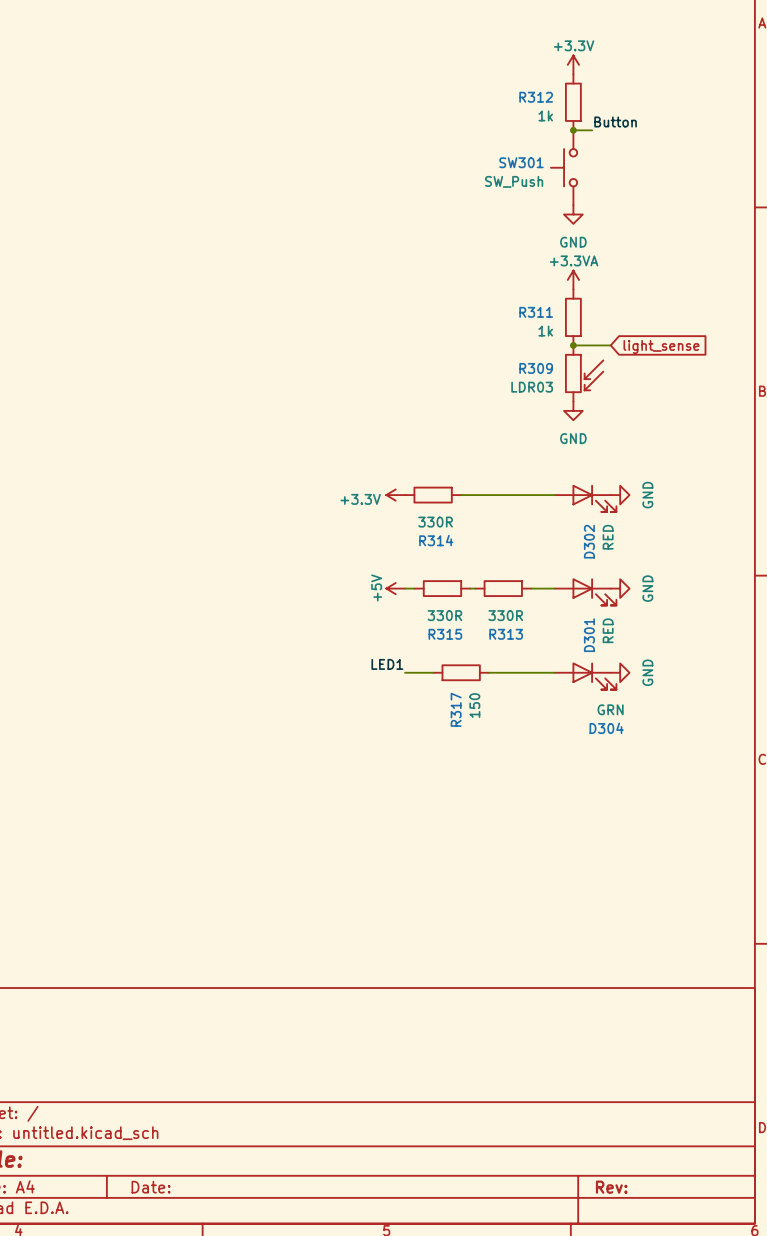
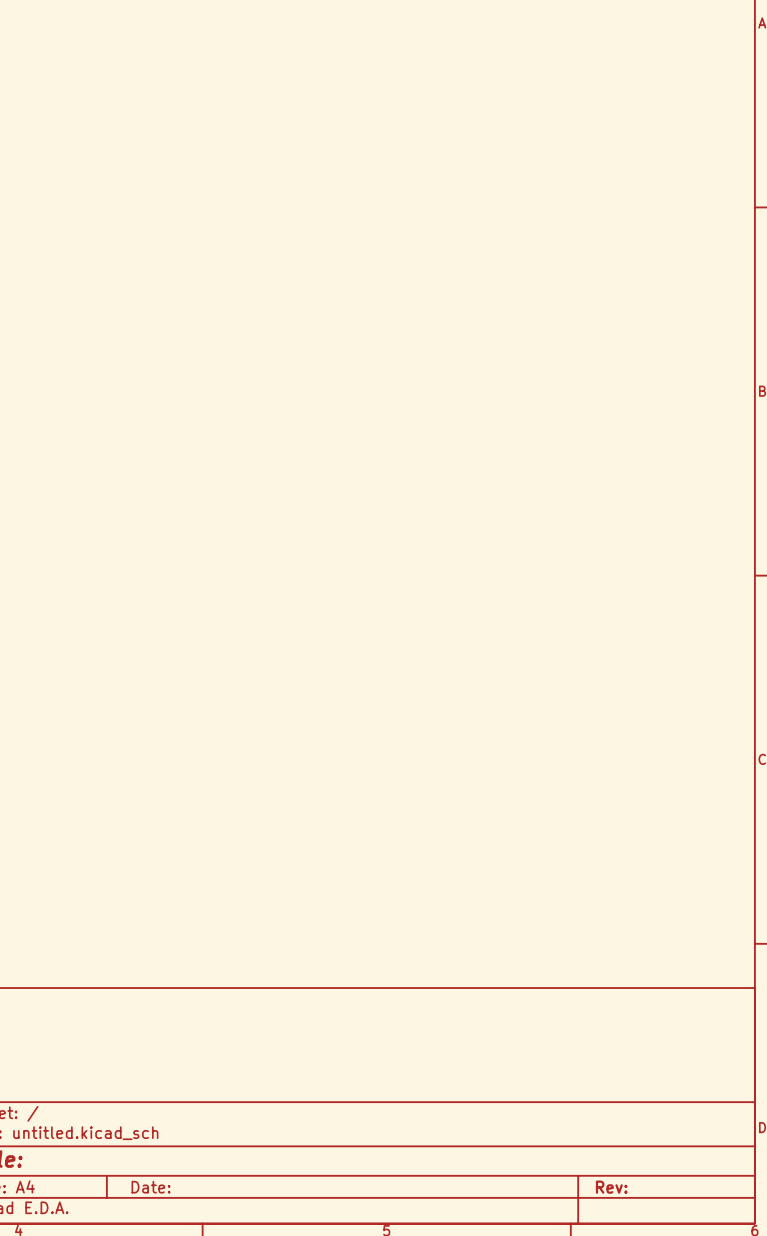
power symbol: +3.3V (573, 64) -> none
R312: 1k (573, 102) -> none
label: Button (615, 121) -> none
wire: (573, 130) (592, 130) -> none
junction: (573, 130) -> none
SW301: SW_Push (564, 167) -> none
power symbol: GND (573, 214) -> none
power symbol: +3.3VA (573, 279) -> none
R311: 1k (573, 317) -> none
wire: (573, 345) (610, 345) -> none
junction: (573, 345) -> none
global label: light_sense (661, 347) -> none
R309: LDR03 (584, 373) -> none
power symbol: GND (573, 410) -> none
power symbol: +3.3V (395, 495) -> none
R314: 330R (433, 495) -> none
wire: (461, 495) (554, 495) -> none
power symbol: GND (620, 495) -> none
D302: RED (585, 498) -> none
power symbol: +5V (395, 588) -> none
wire: (405, 588) (414, 588) -> none
R315: 330R (442, 588) -> none
wire: (470, 588) (475, 588) -> none
R313: 330R (503, 588) -> none
wire: (531, 588) (554, 588) -> none
power symbol: GND (620, 588) -> none
D301: RED (585, 591) -> none
label: LED1 (387, 664) -> none
wire: (405, 672) (433, 672) -> none
R317: 150 (461, 672) -> none
wire: (489, 672) (554, 672) -> none
power symbol: GND (620, 672) -> none
D304: GRN (585, 676) -> none

